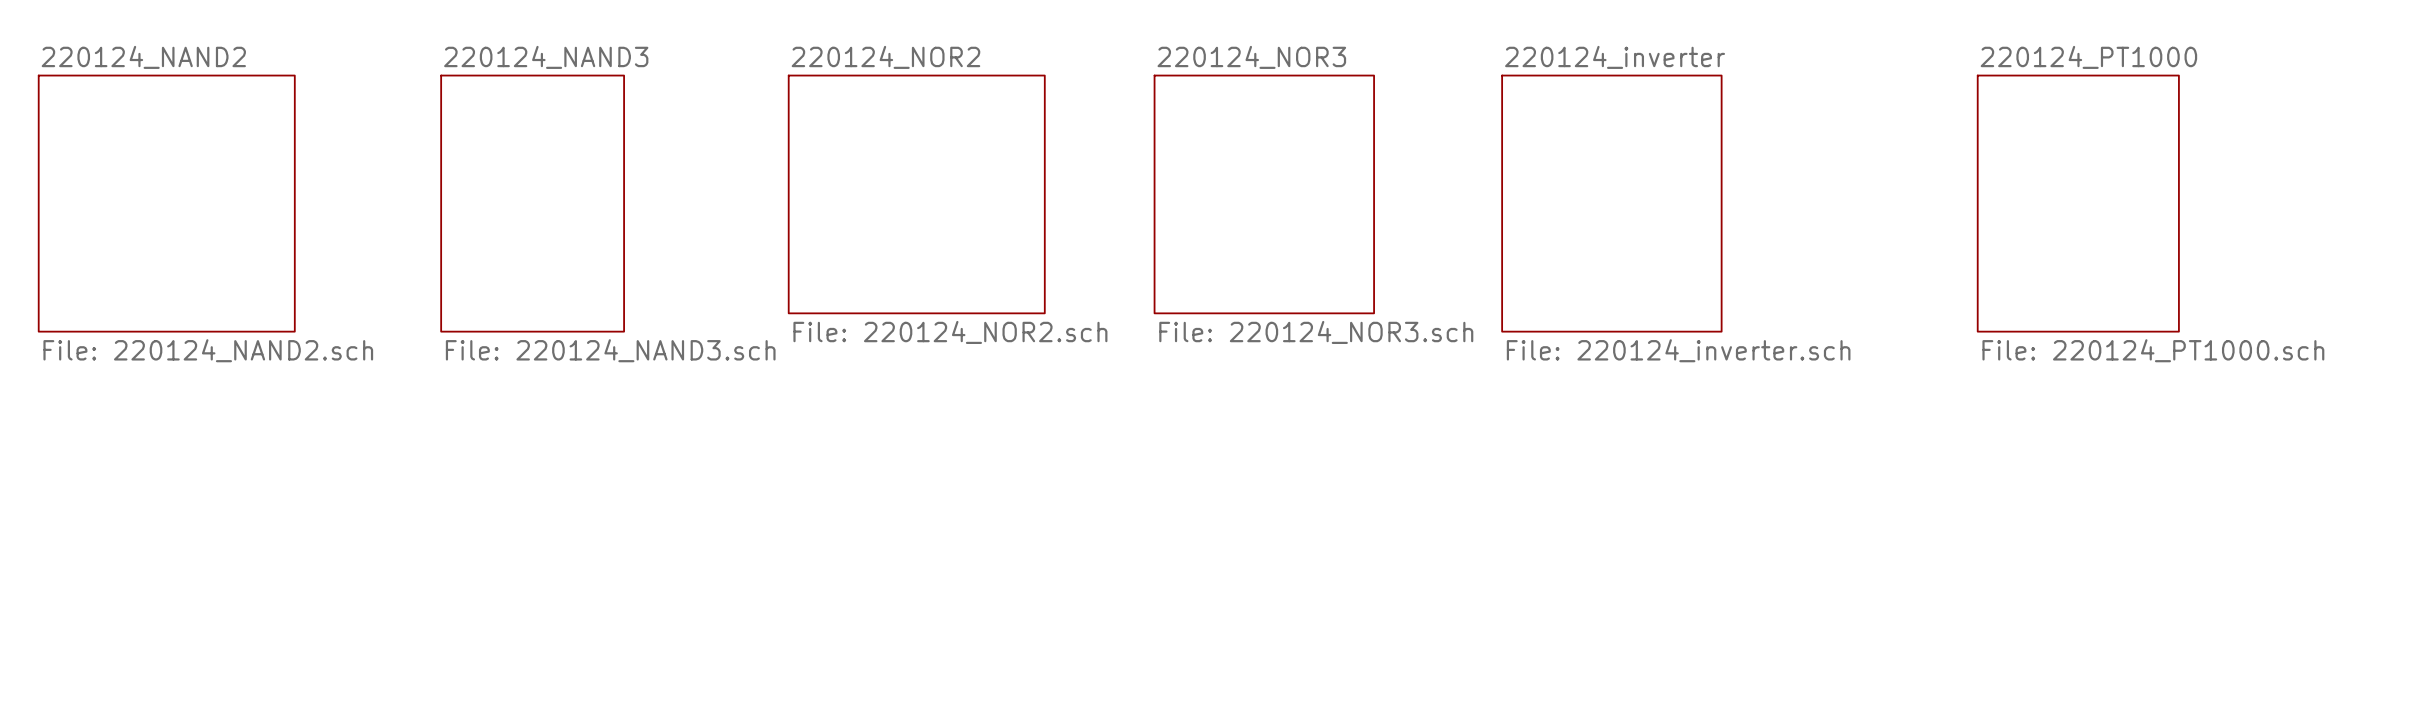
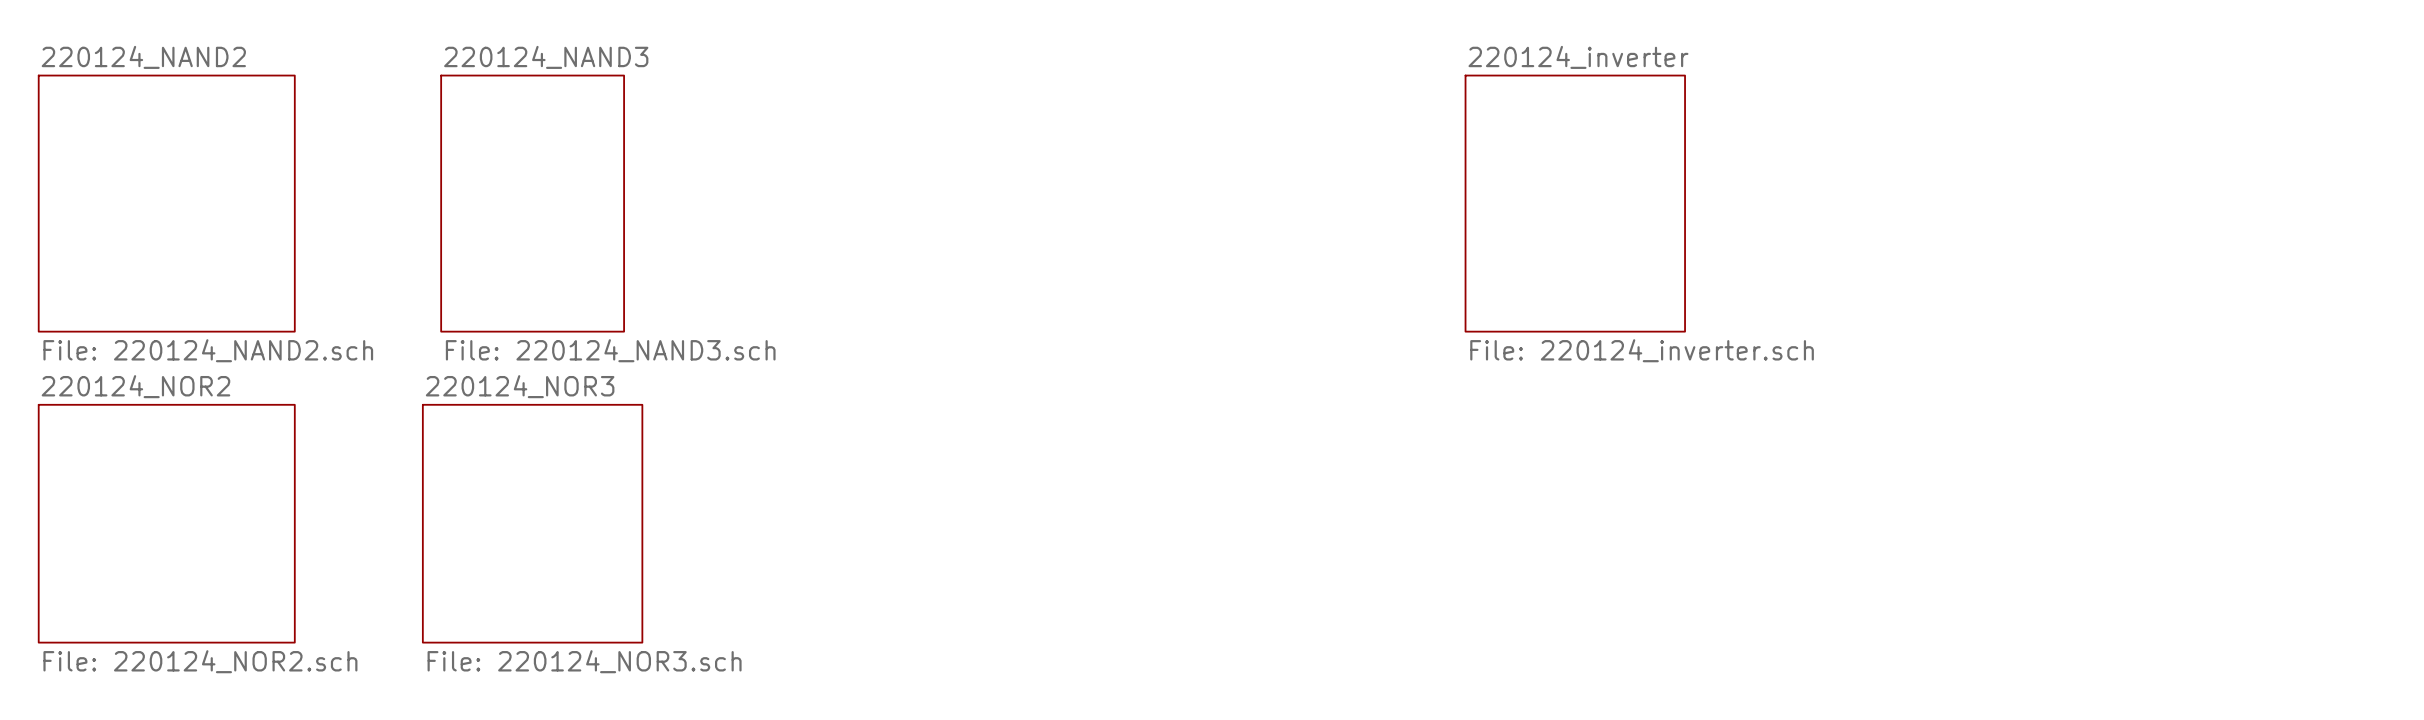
sheet 220124_NOR2 position: (916, 194) -> (166, 523)
sheet 220124_NOR3 position: (1264, 194) -> (532, 523)
sheet 220124_inverter position: (1611, 203) -> (1575, 203)
sheet 220124_PT1000: File: 220124_PT1000.sch (2078, 203) -> none

